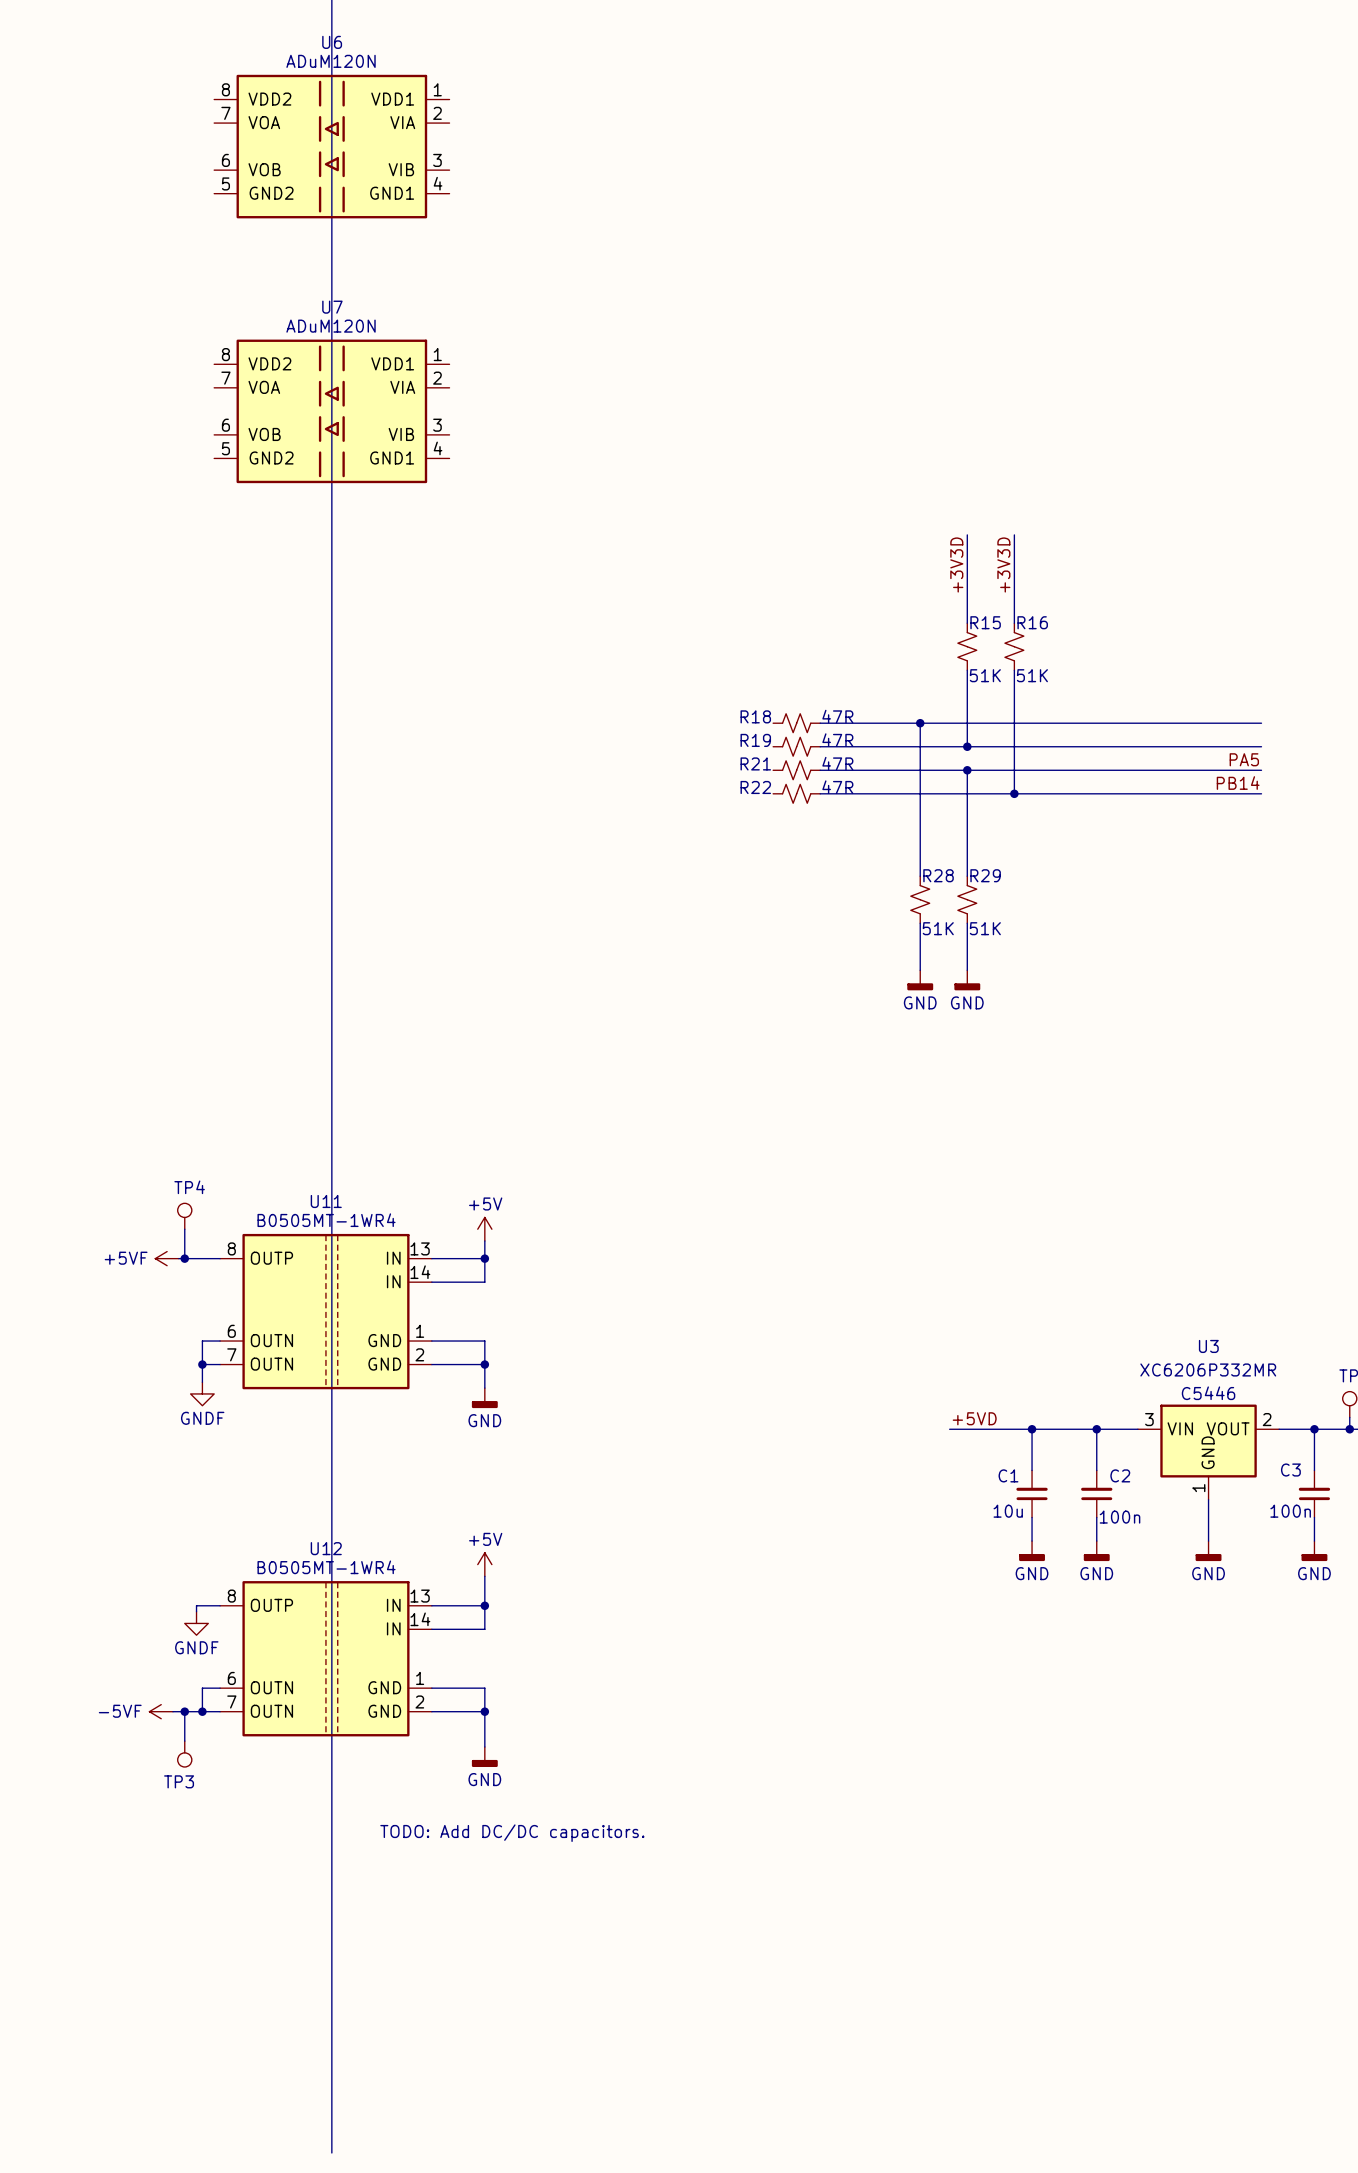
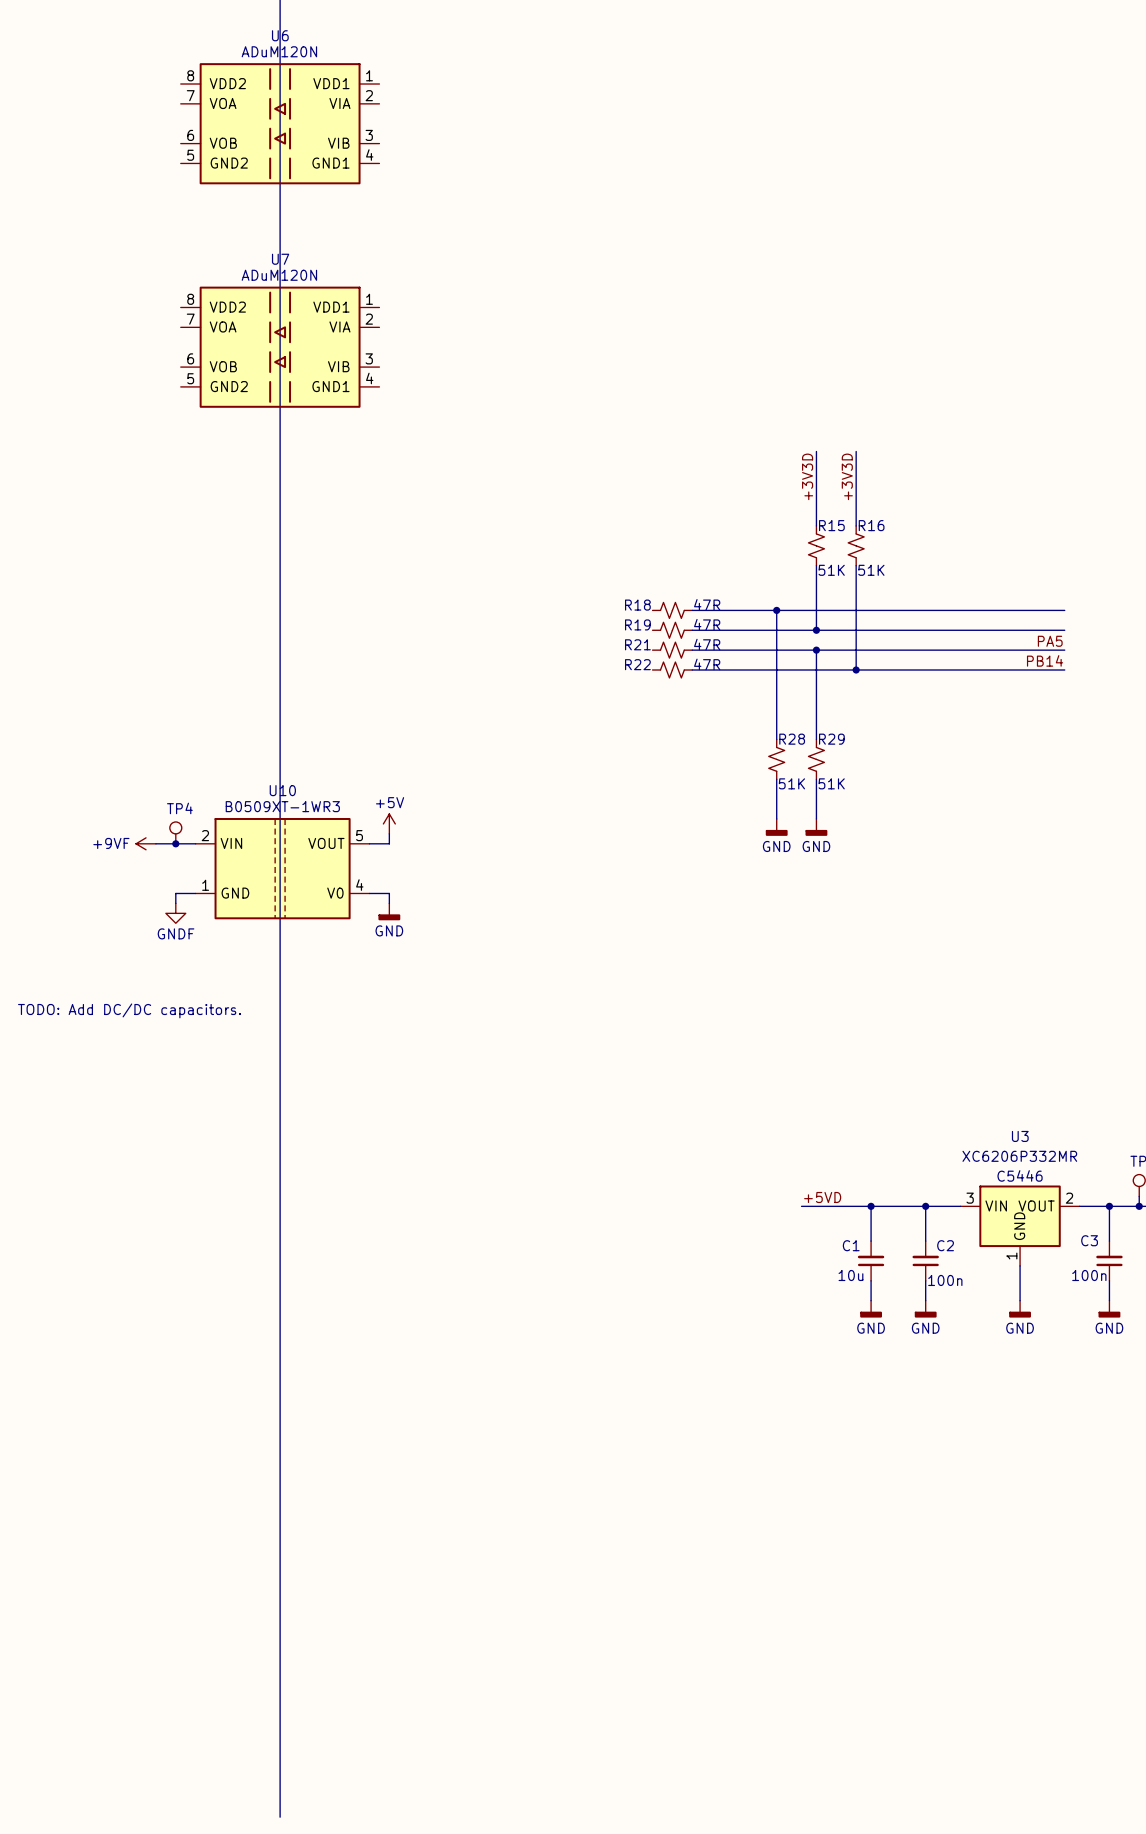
power symbol: none -> +5V (389, 823)
wire: none -> (389, 833) (389, 843) (369, 843)
power symbol: none -> +9VF (146, 843)
wire: none -> (155, 843) (195, 843)
junction: none -> (175, 843)
U10: none -> B0509XT-1WR3 (282, 868)
wire: none -> (195, 893) (175, 893) (175, 903)
wire: none -> (369, 893) (389, 893) (389, 903)
power symbol: none -> GND (389, 911)
power symbol: none -> GNDF (175, 913)
text: none -> TODO: Add DC/DC capacitors. (129, 1010)
TP4 position: (184, 1216) -> (175, 832)
wire: (184, 1229) (184, 1258) -> none
power symbol: +5V (484, 1229) -> none
wire: (484, 1240) (484, 1282) (431, 1282) -> none
power symbol: +5VF (167, 1258) -> none
wire: (178, 1258) (220, 1258) -> none
junction: (184, 1258) -> none
wire: (431, 1258) (484, 1258) -> none
junction: (484, 1258) -> none
U11: B0505MT-1WR4 (325, 1311) -> none
wire: (220, 1341) (202, 1341) (202, 1382) -> none
wire: (431, 1341) (484, 1341) (484, 1388) -> none
wire: (202, 1364) (220, 1364) -> none
junction: (202, 1364) -> none
wire: (431, 1364) (484, 1364) -> none
junction: (484, 1364) -> none
power symbol: GNDF (202, 1393) -> none
power symbol: GND (484, 1398) -> none
power symbol: +5V (484, 1564) -> none
wire: (484, 1576) (484, 1629) (431, 1629) -> none
wire: (220, 1605) (196, 1605) (196, 1611) -> none
wire: (431, 1605) (484, 1605) -> none
junction: (484, 1605) -> none
power symbol: GNDF (196, 1623) -> none
U12: B0505MT-1WR4 (325, 1658) -> none
wire: (220, 1688) (202, 1688) (202, 1711) -> none
wire: (431, 1688) (484, 1688) (484, 1746) -> none
power symbol: -5VF (161, 1711) -> none
wire: (172, 1711) (220, 1711) -> none
wire: (184, 1711) (184, 1741) -> none
junction: (184, 1711) -> none
junction: (202, 1711) -> none
wire: (431, 1711) (484, 1711) -> none
junction: (484, 1711) -> none
TP3: (184, 1754) -> none
power symbol: GND (484, 1757) -> none
text: TODO: Add DC/DC capacitors. (512, 1833) -> none

